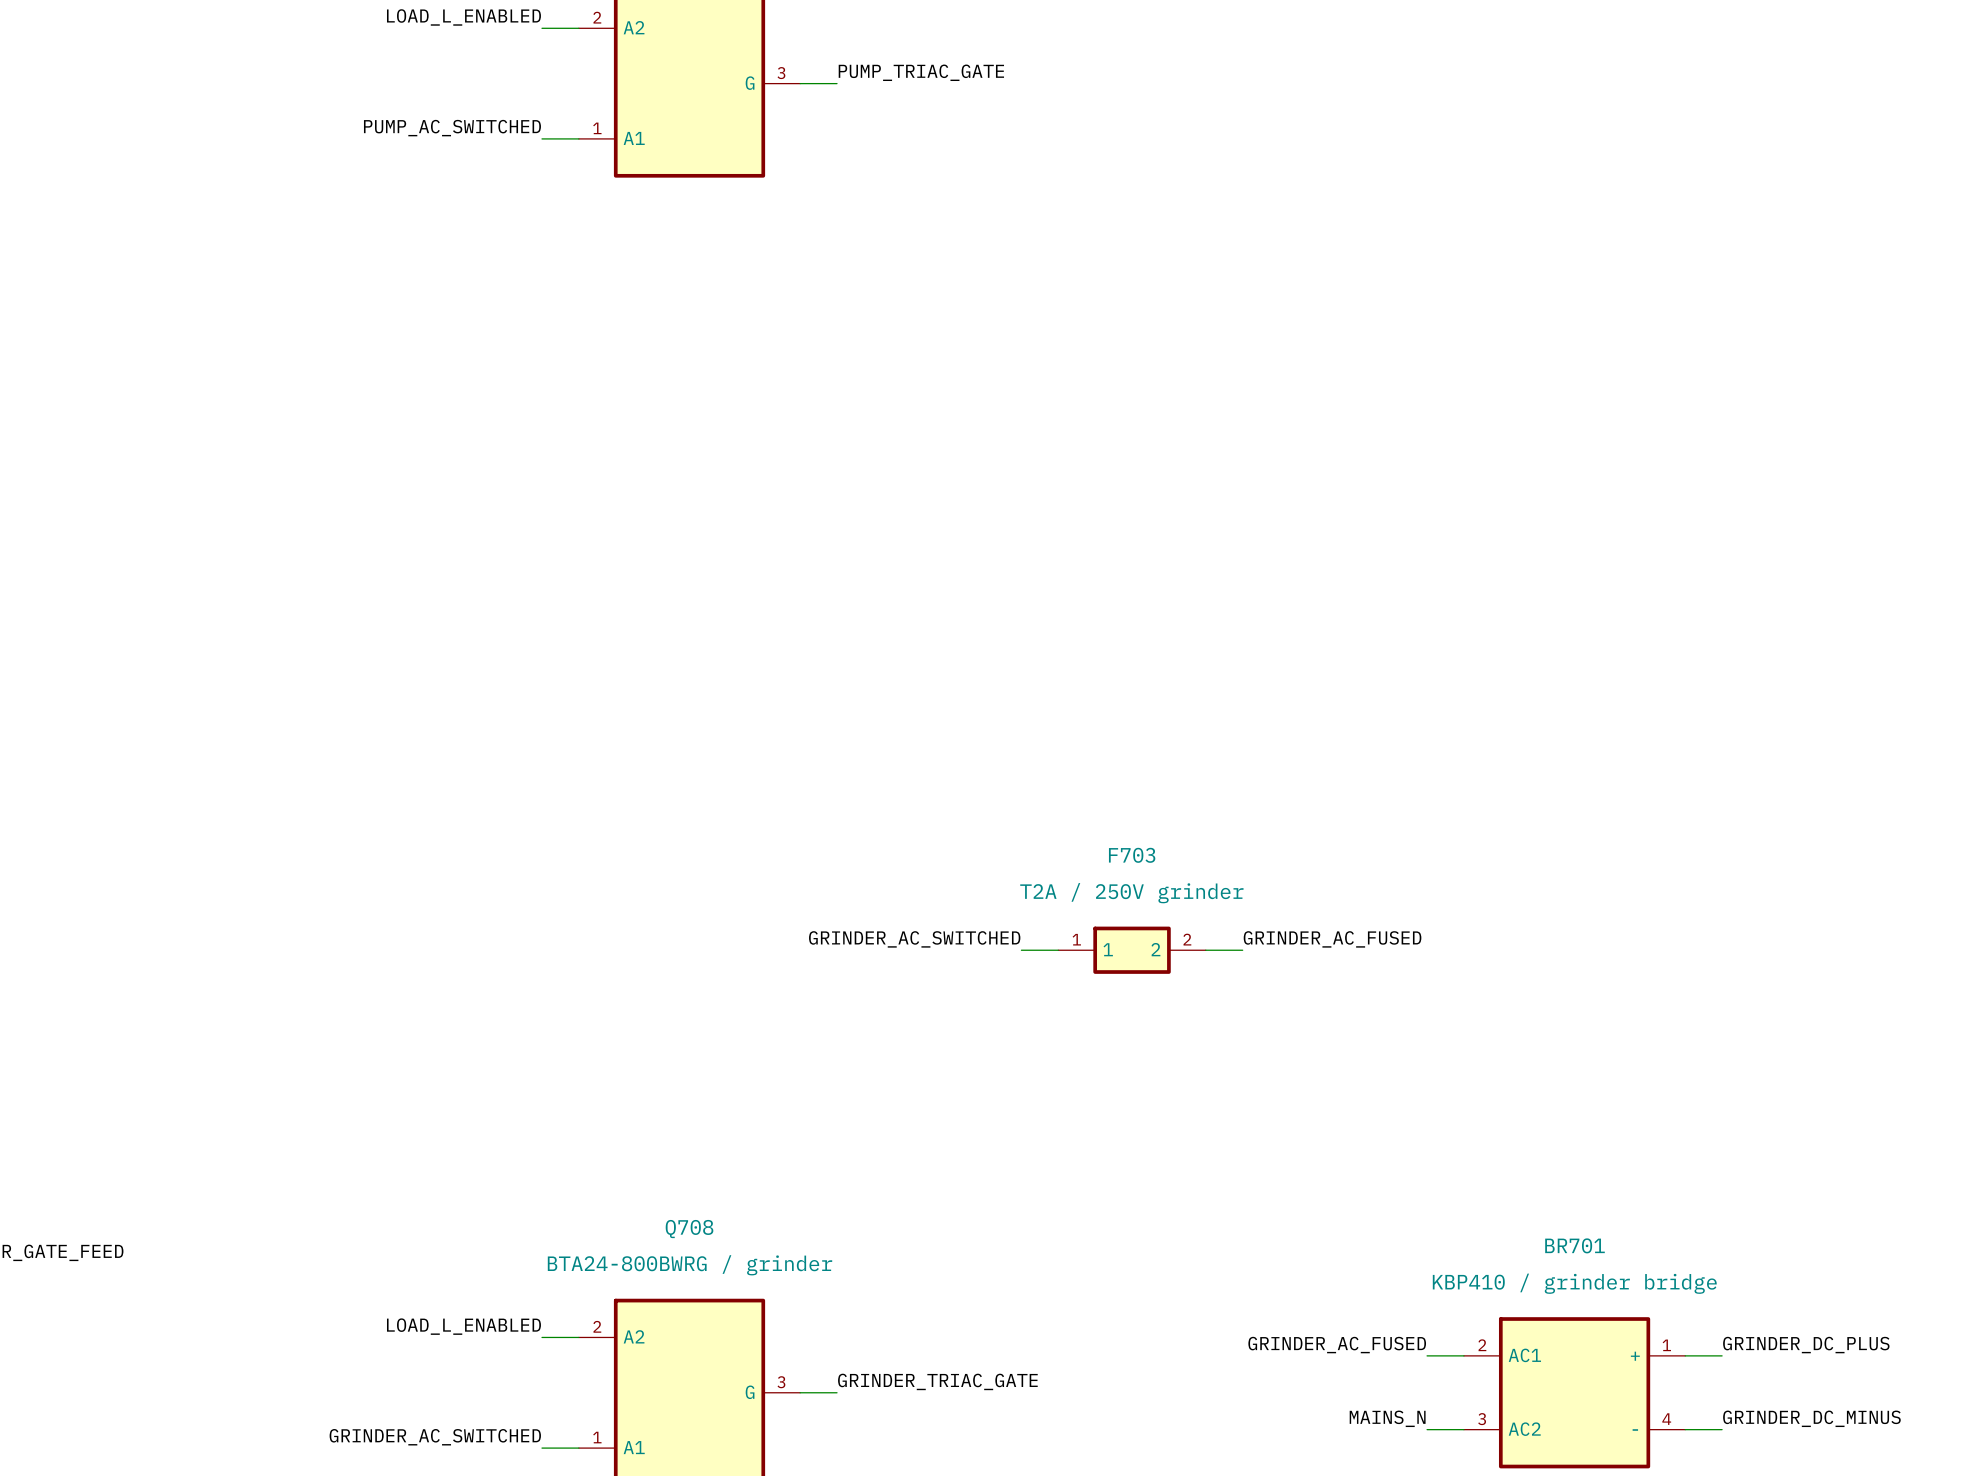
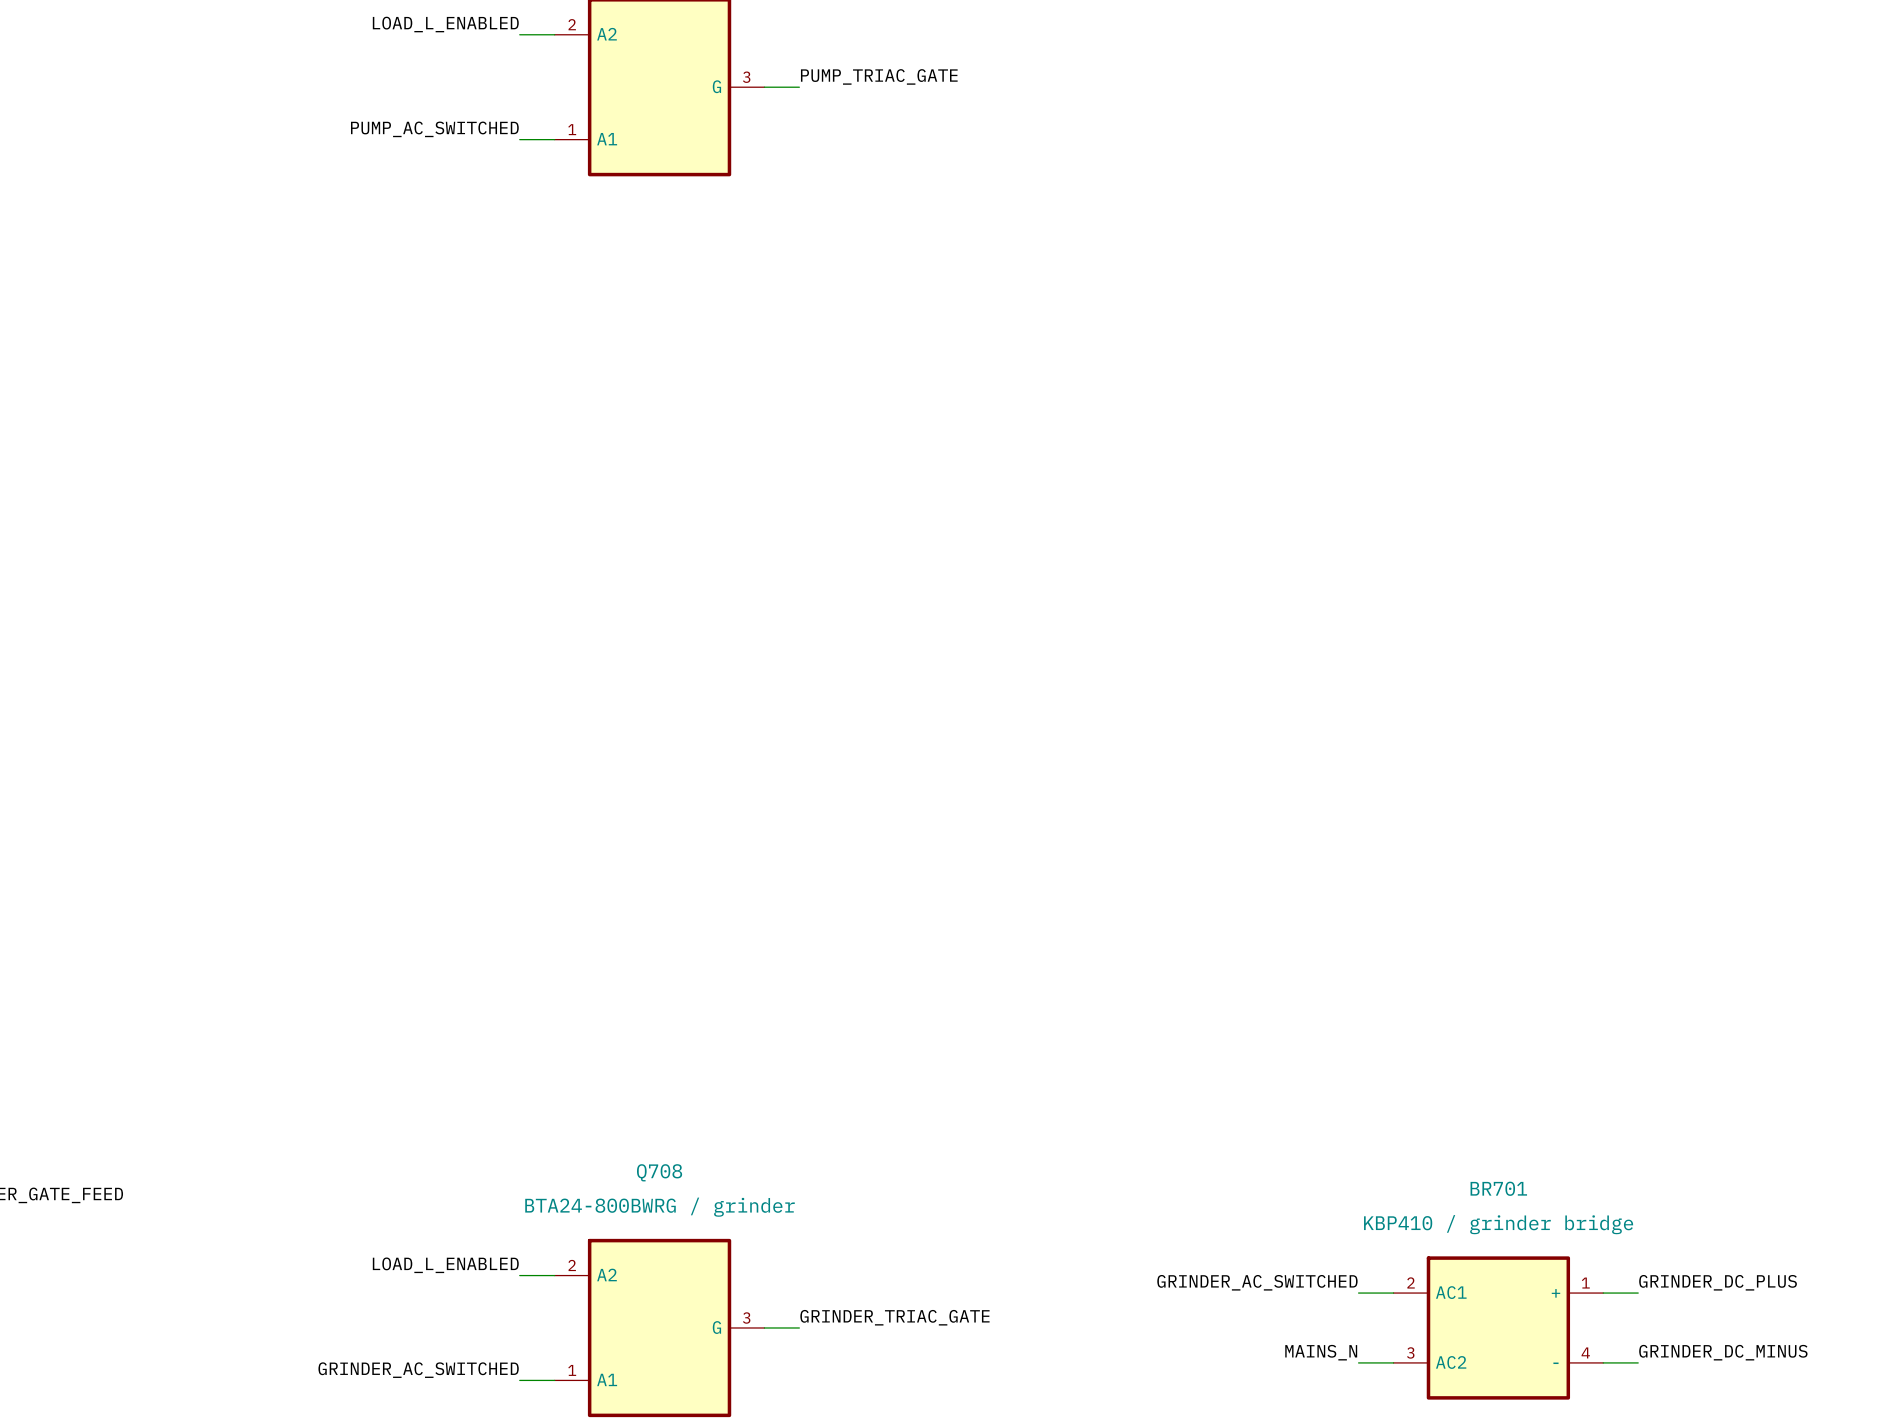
label: GRINDER_AC_SWITCHED (914, 939) -> none
label: GRINDER_AC_FUSED (1332, 939) -> none
wire: (1021, 950) (1058, 950) -> none
F703: T2A / 250V grinder (1132, 950) -> none
wire: (1205, 950) (1242, 950) -> none
label: GRINDER_AC_FUSED (1337, 1345) -> GRINDER_AC_SWITCHED (1257, 1282)

